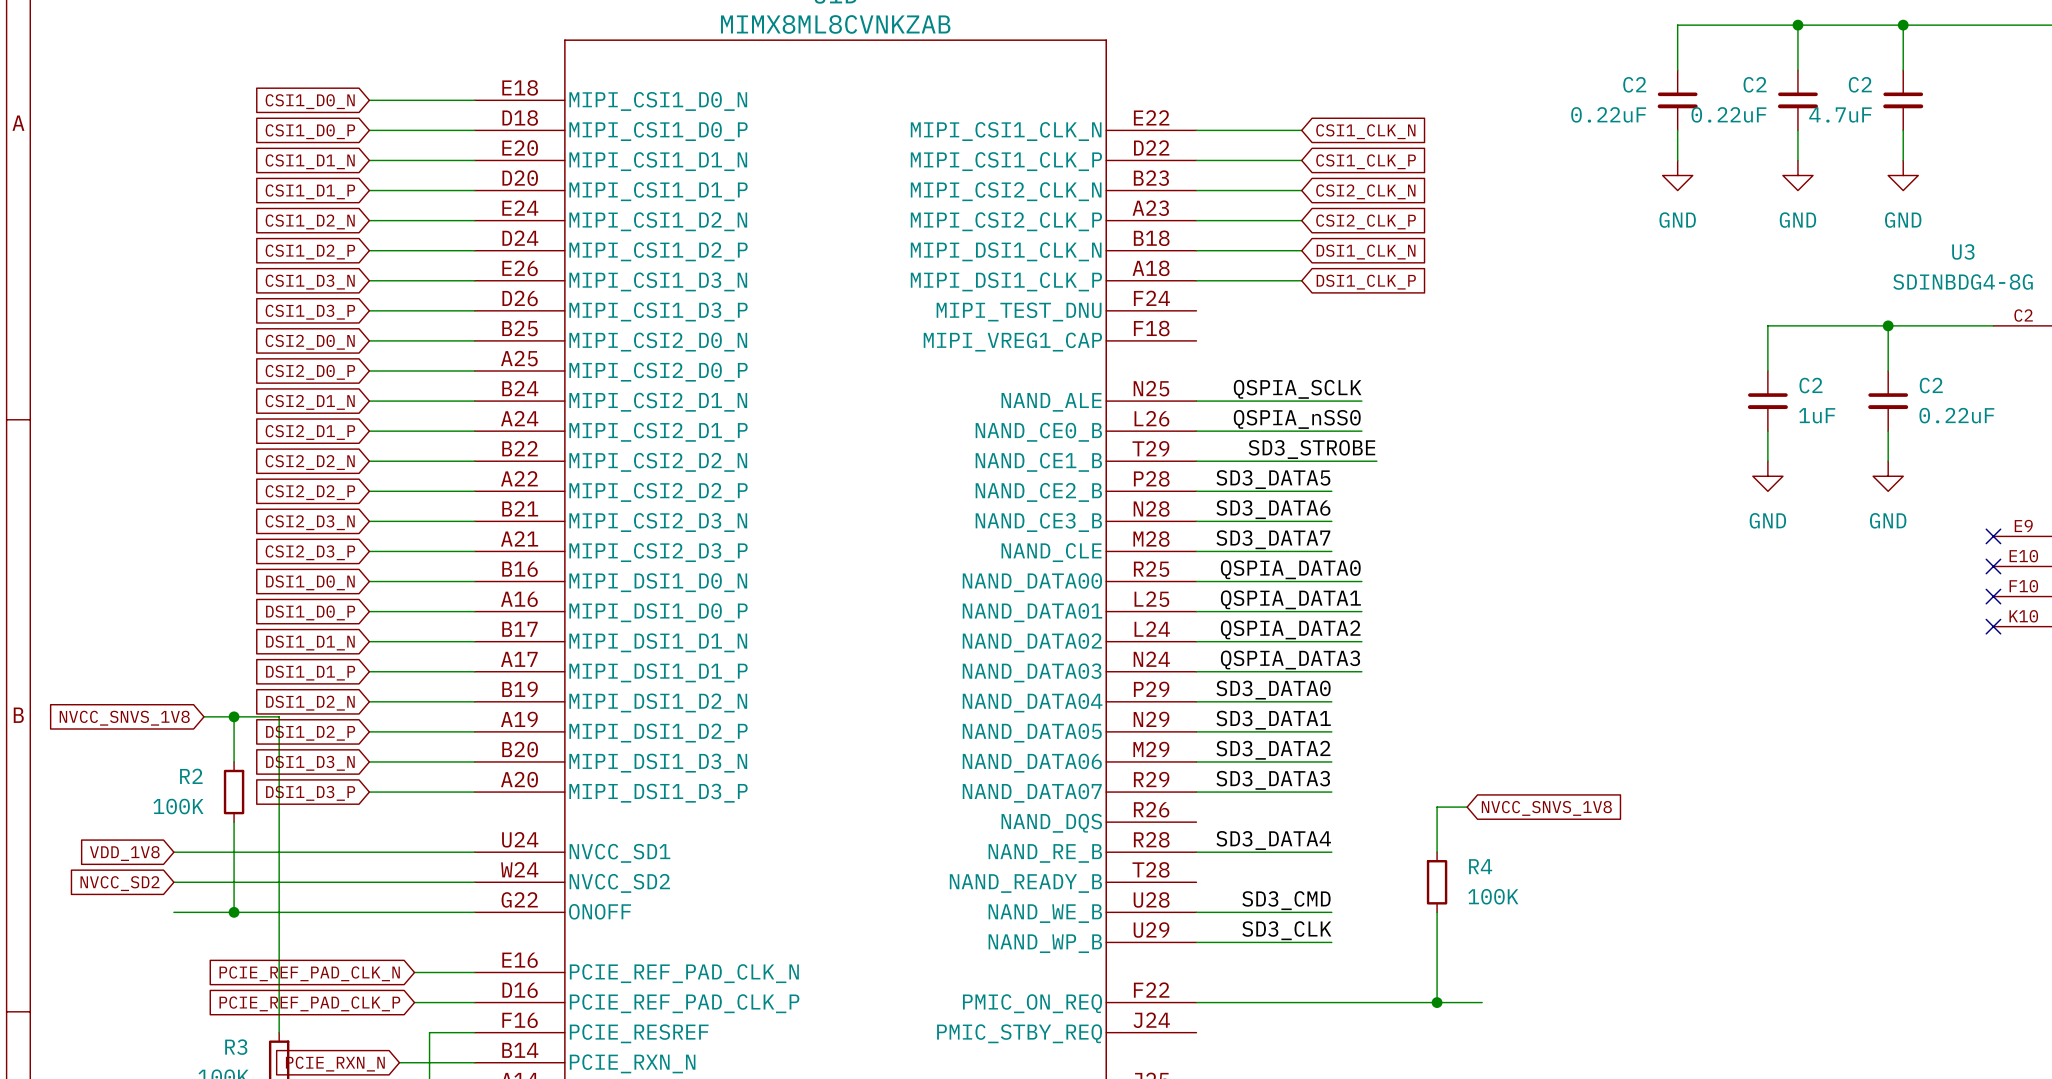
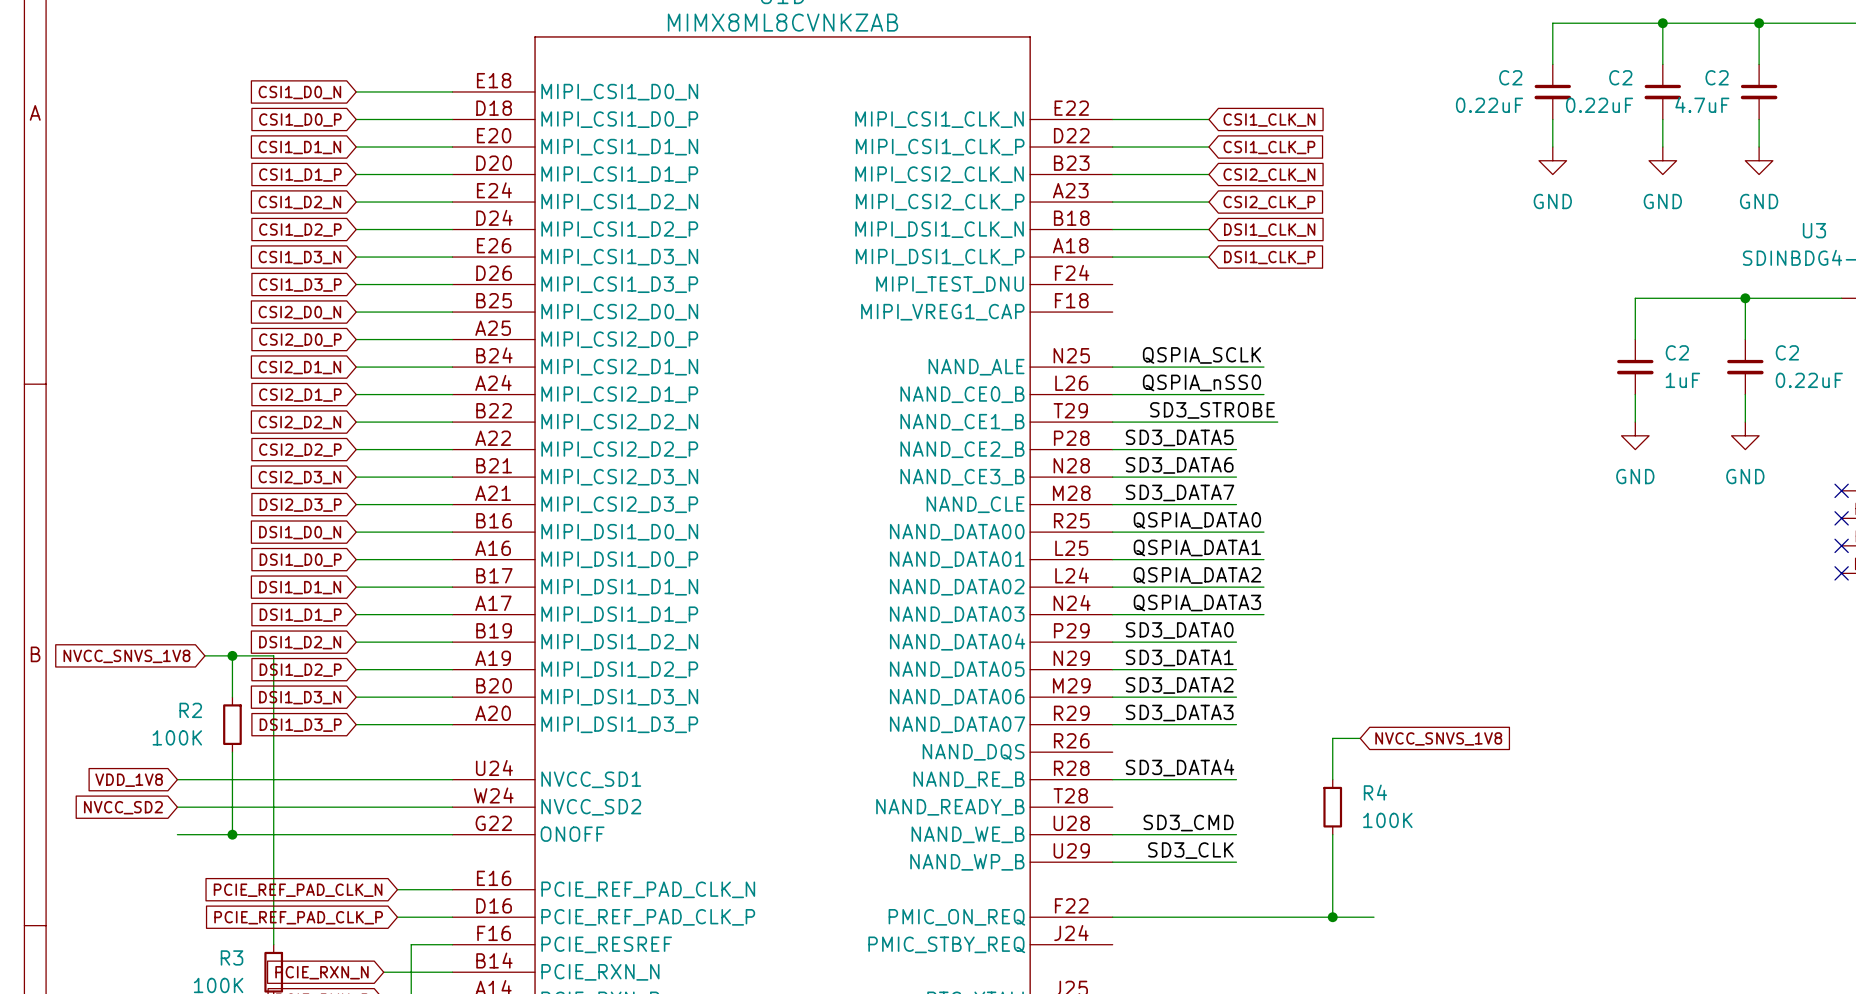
global label: CSI2_D3_P (310, 552) -> DSI2_D3_P (300, 505)

